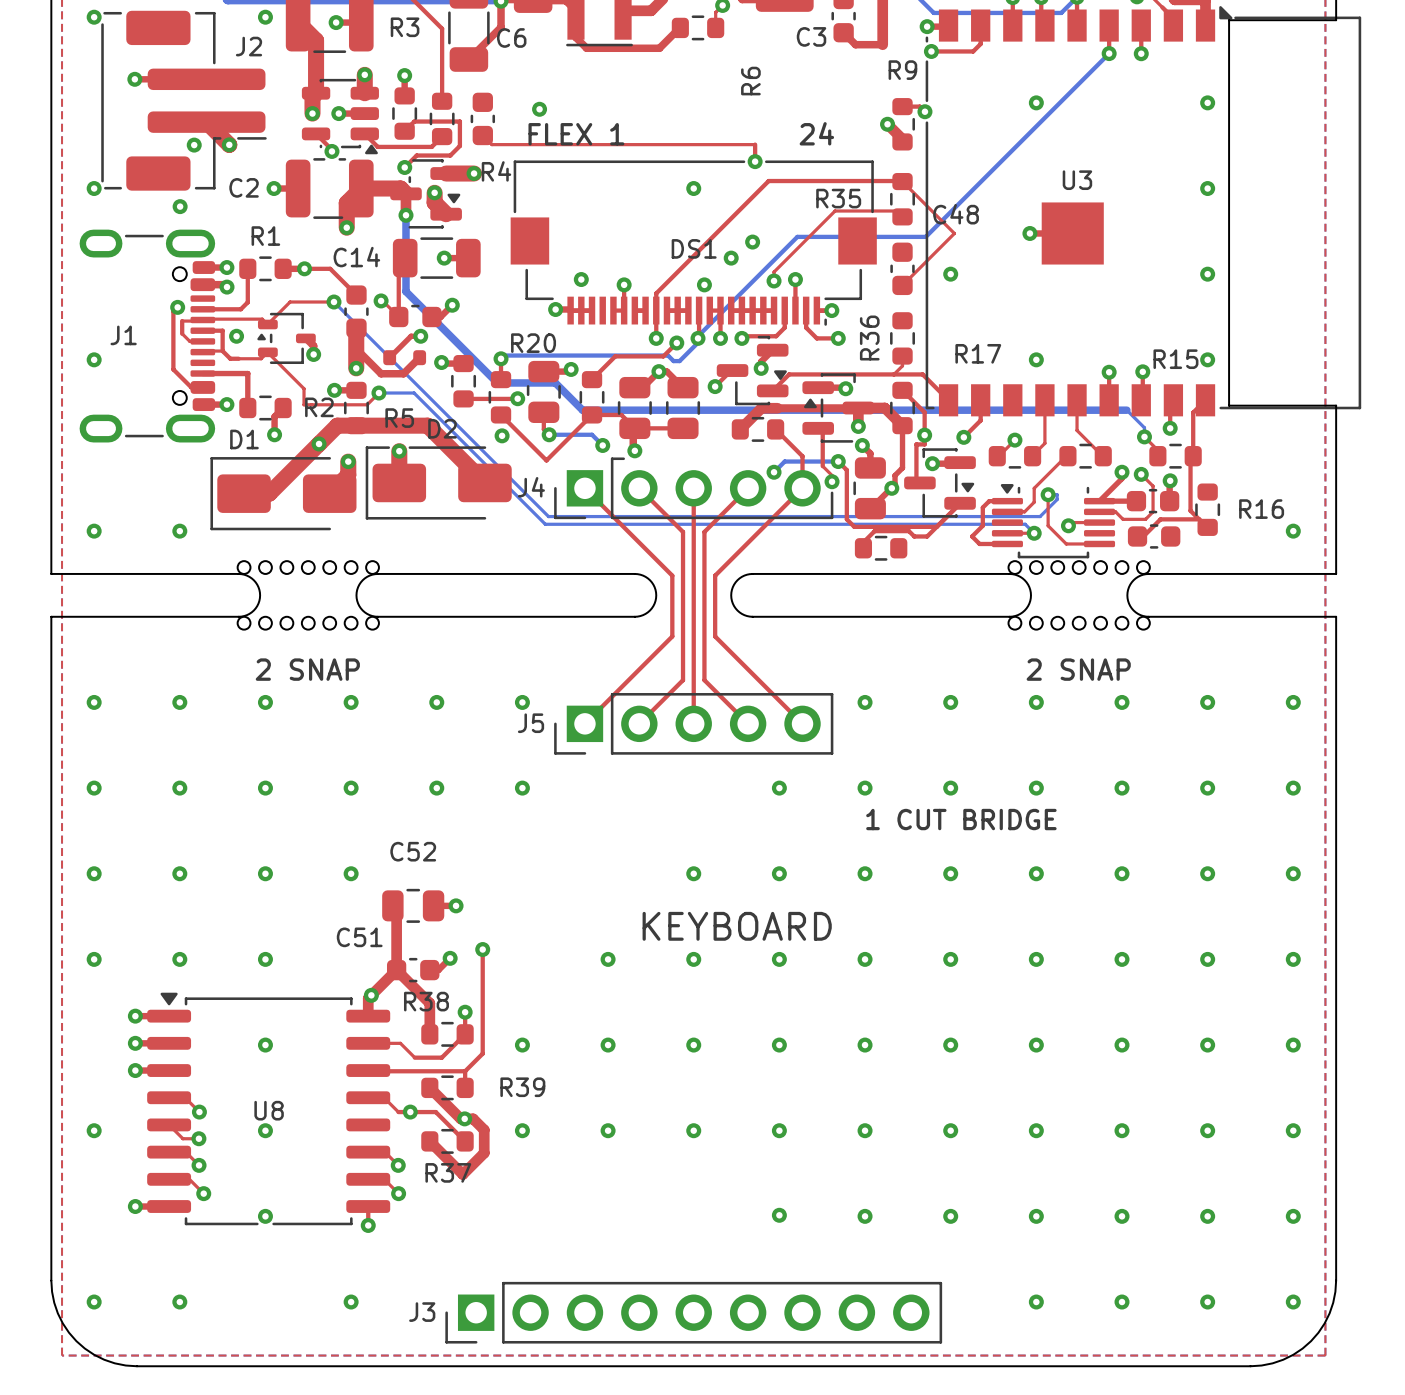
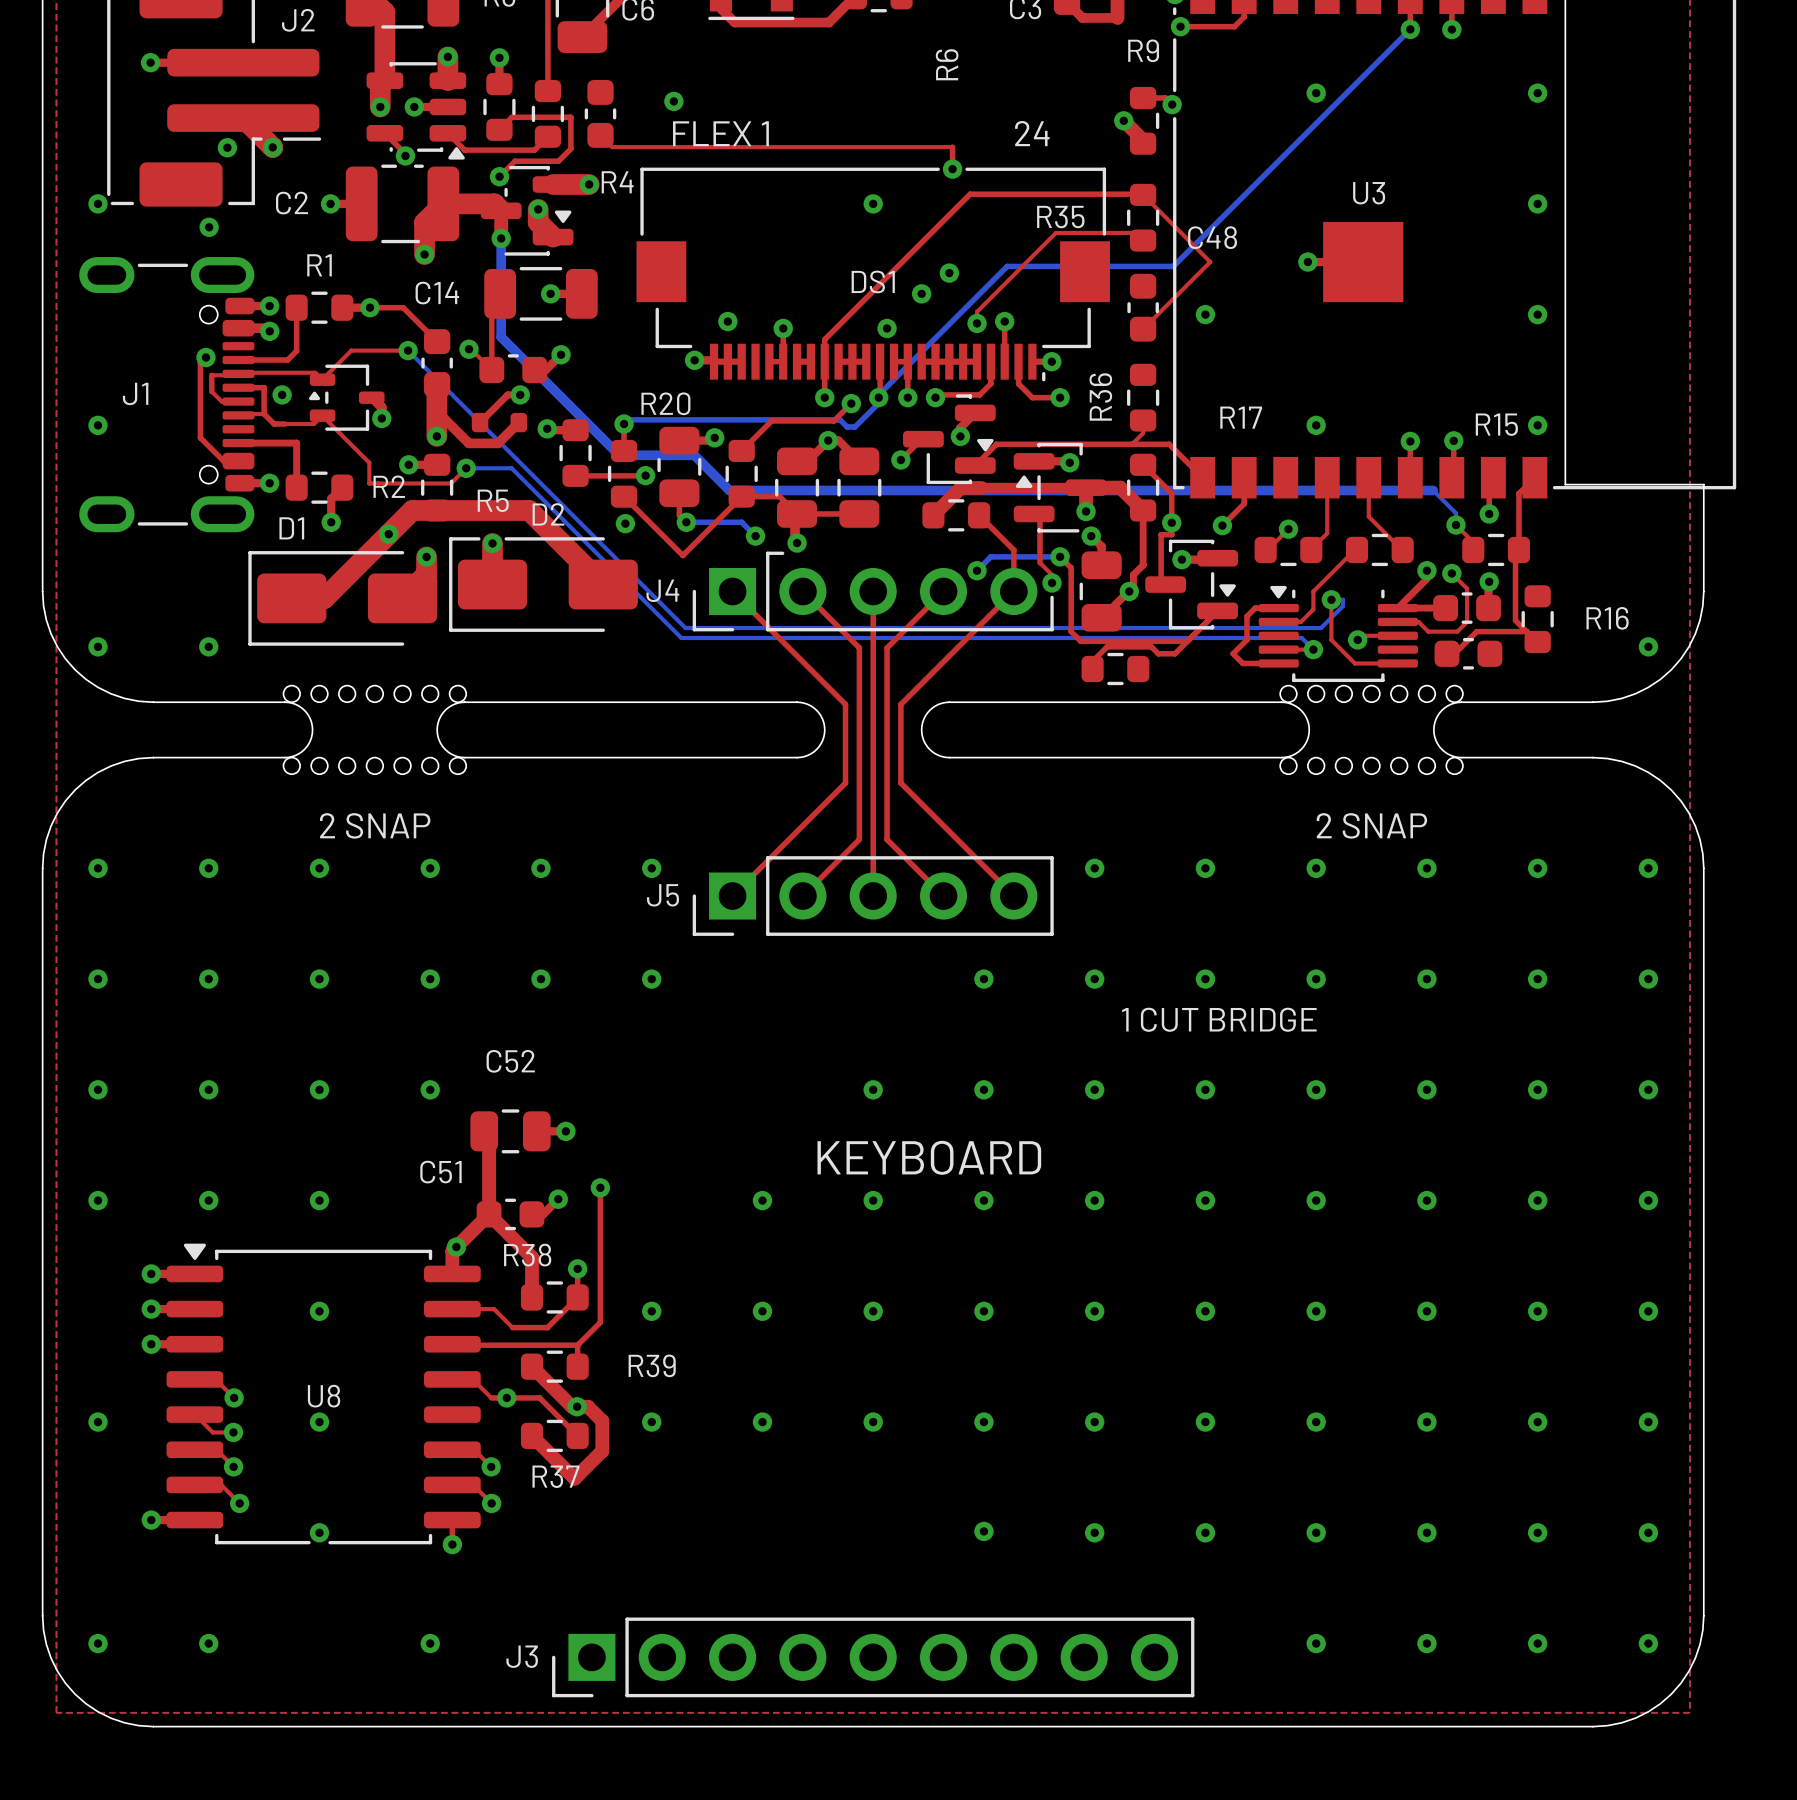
board edge: (51, 488) (51, 573) (136, 573) -> (42, 591) (43, 605) (51, 633) (65, 658) (75, 669) (85, 679) (110, 693) (138, 701) (153, 702)
board edge: (1336, 488) (1336, 573) (1250, 573) -> (1703, 591) (1700, 620) (1695, 633) (1680, 658) (1671, 669) (1660, 679) (1635, 693) (1607, 701) (1593, 702)
board edge: (136, 616) (51, 616) (51, 702) -> (153, 757) (138, 758) (110, 766) (85, 780) (75, 790) (57, 812) (51, 825) (43, 853) (42, 868)
board edge: (1250, 616) (1336, 616) (1336, 702) -> (1593, 757) (1621, 761) (1635, 766) (1648, 772) (1671, 790) (1680, 800) (1695, 825) (1700, 839) (1703, 868)

